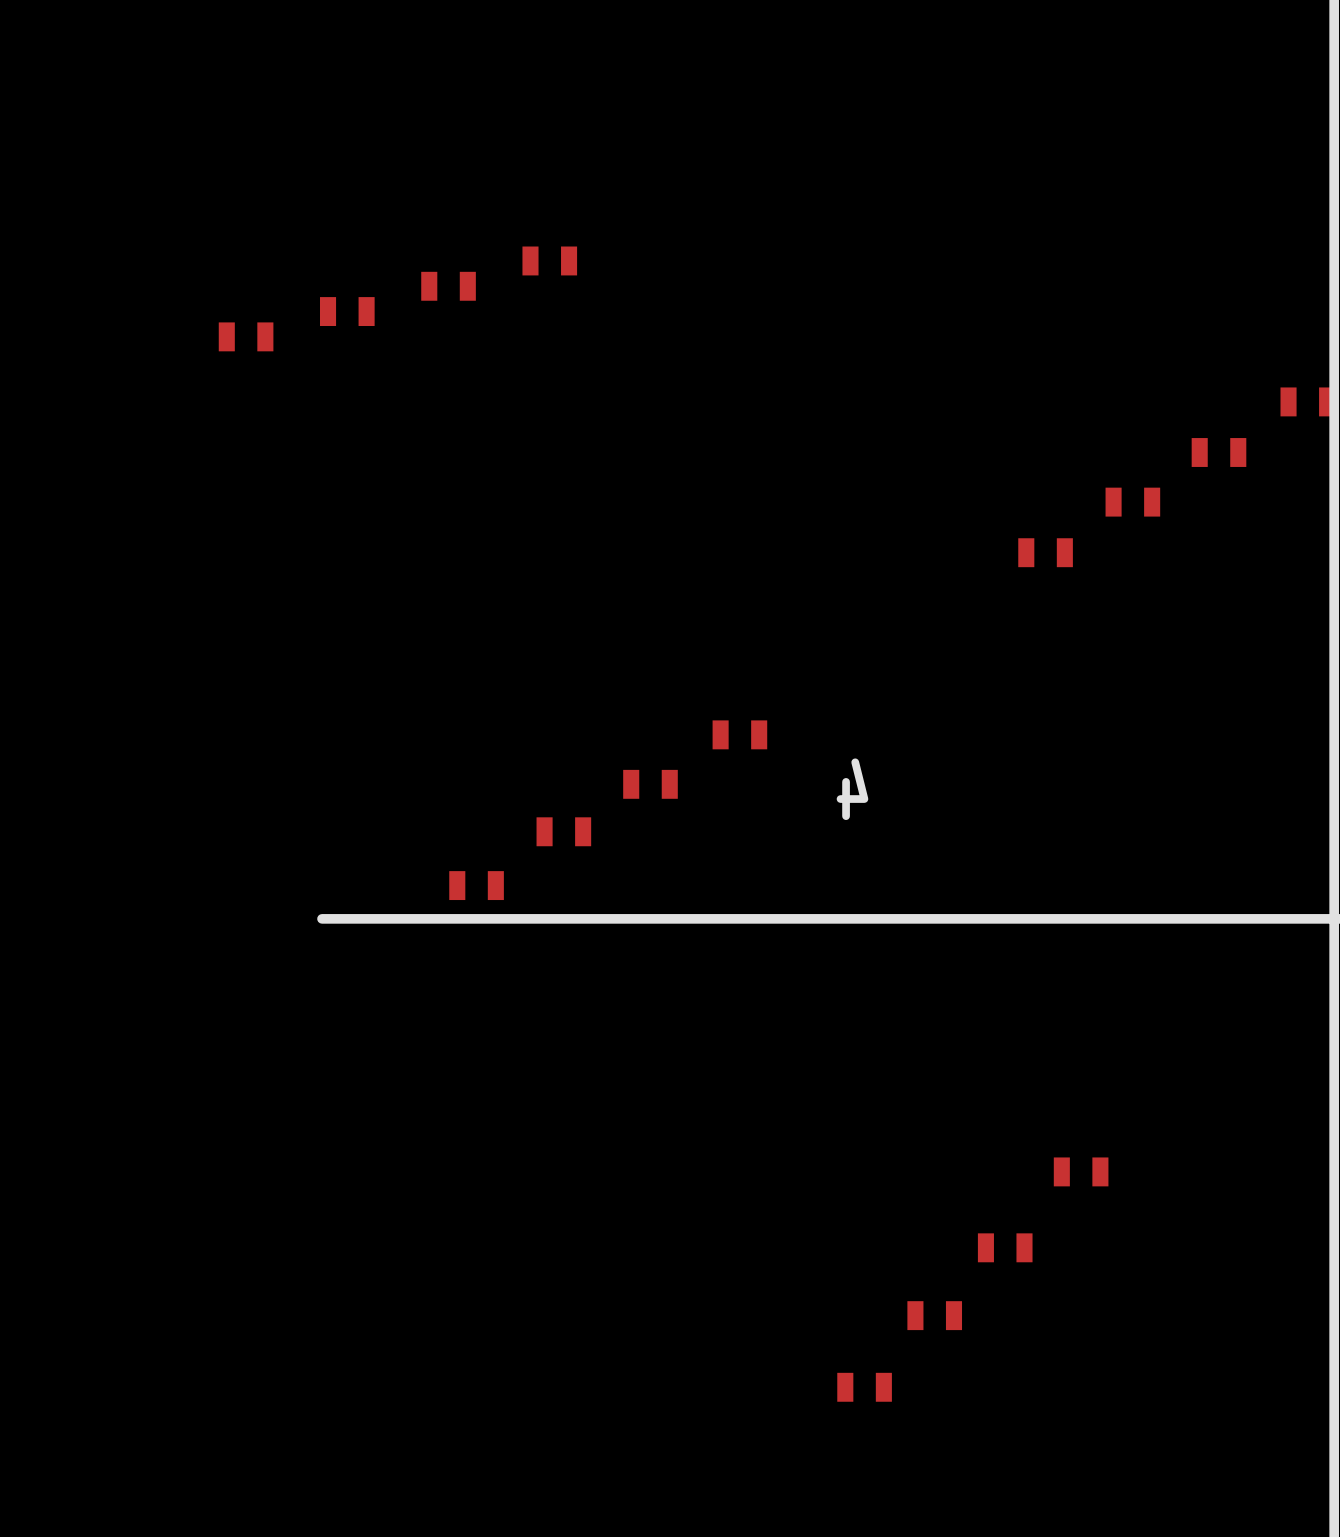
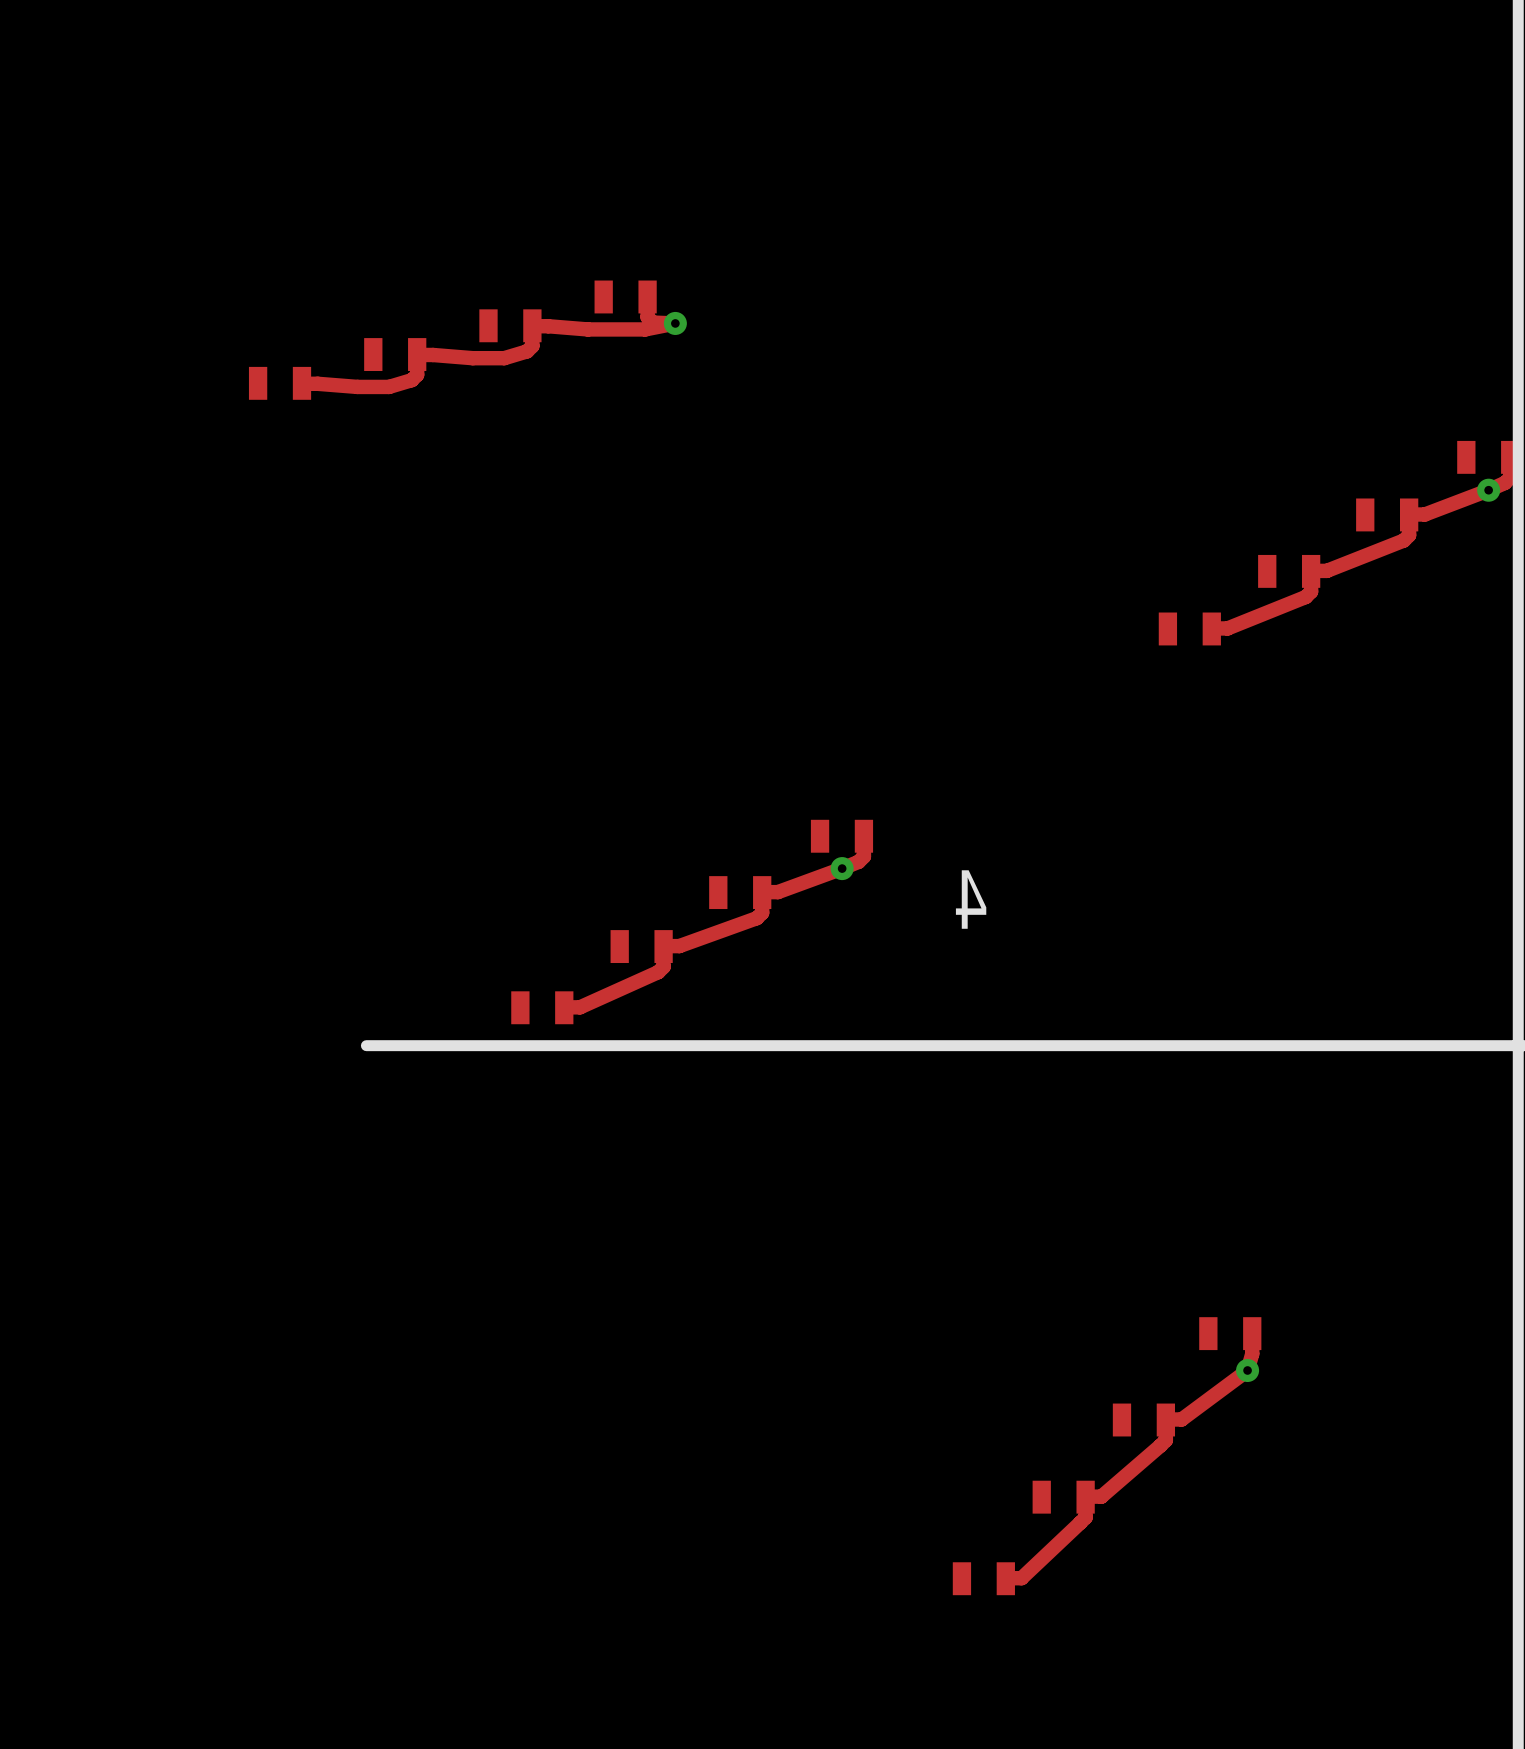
top track: none -> (647, 296) (647, 317) (652, 322) (675, 323) (645, 329) (587, 329) (532, 325) (532, 346) (527, 351) (504, 358) (417, 354) (417, 374) (411, 380) (389, 386) (301, 383)
via: none -> (675, 323)
top track: none -> (1510, 457) (1510, 477) (1504, 482) (1424, 514) (1409, 514) (1409, 535) (1403, 540) (1326, 570) (1311, 571) (1311, 591) (1305, 597) (1227, 628) (1211, 628)
via: none -> (1488, 490)
top track: none -> (863, 836) (863, 856) (858, 861) (777, 892) (762, 892) (762, 912) (756, 918) (679, 946) (663, 946) (663, 966) (658, 972) (580, 1007) (564, 1007)
via: none -> (842, 868)
top track: none -> (1252, 1333) (1252, 1353) (1247, 1370) (1181, 1419) (1165, 1420) (1165, 1440) (1160, 1445) (1101, 1496) (1085, 1497) (1085, 1517) (1021, 1578) (1005, 1578)
via: none -> (1247, 1370)

